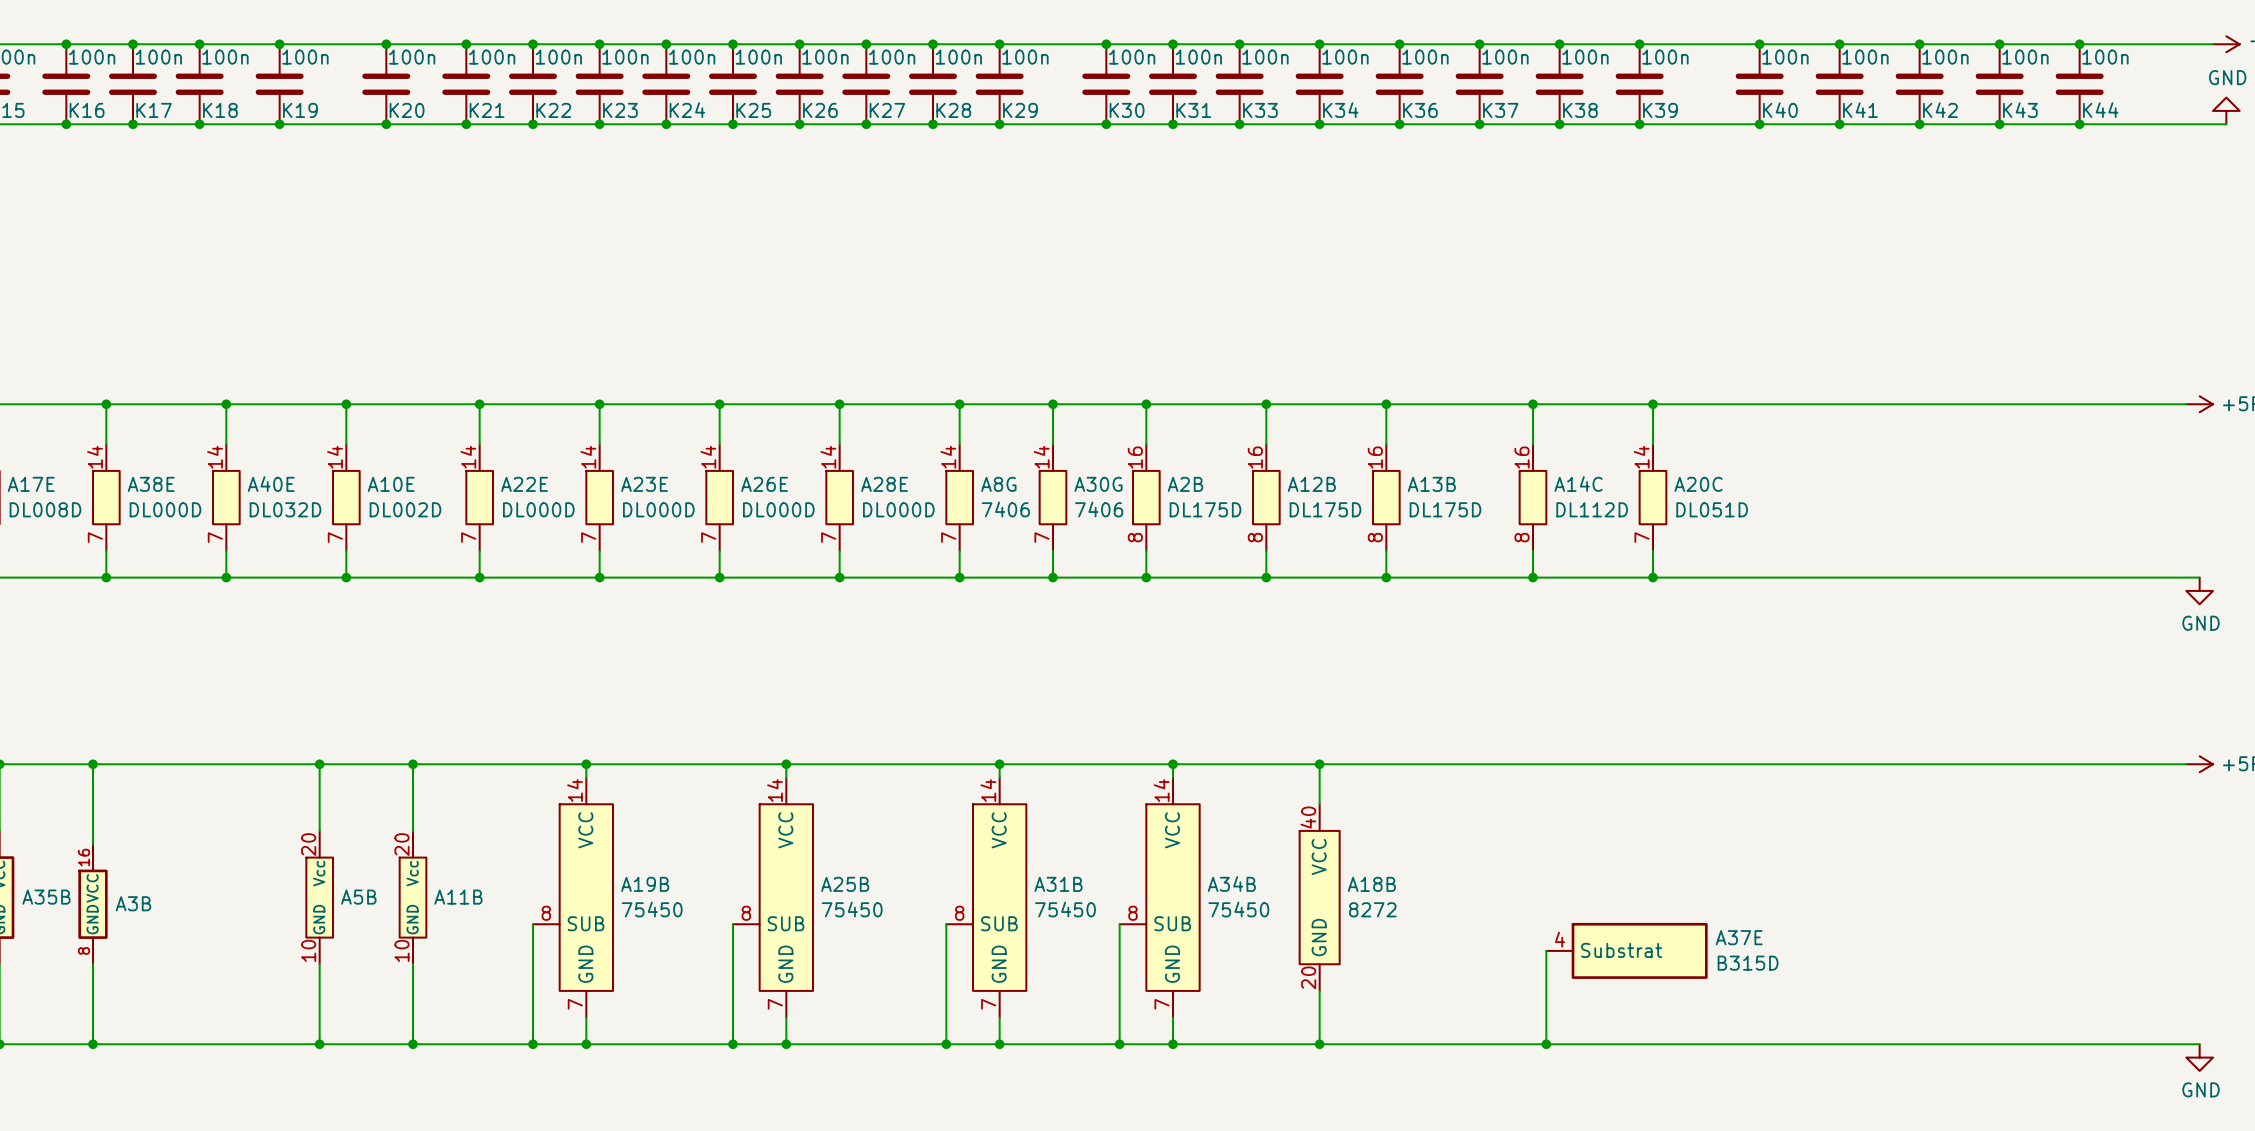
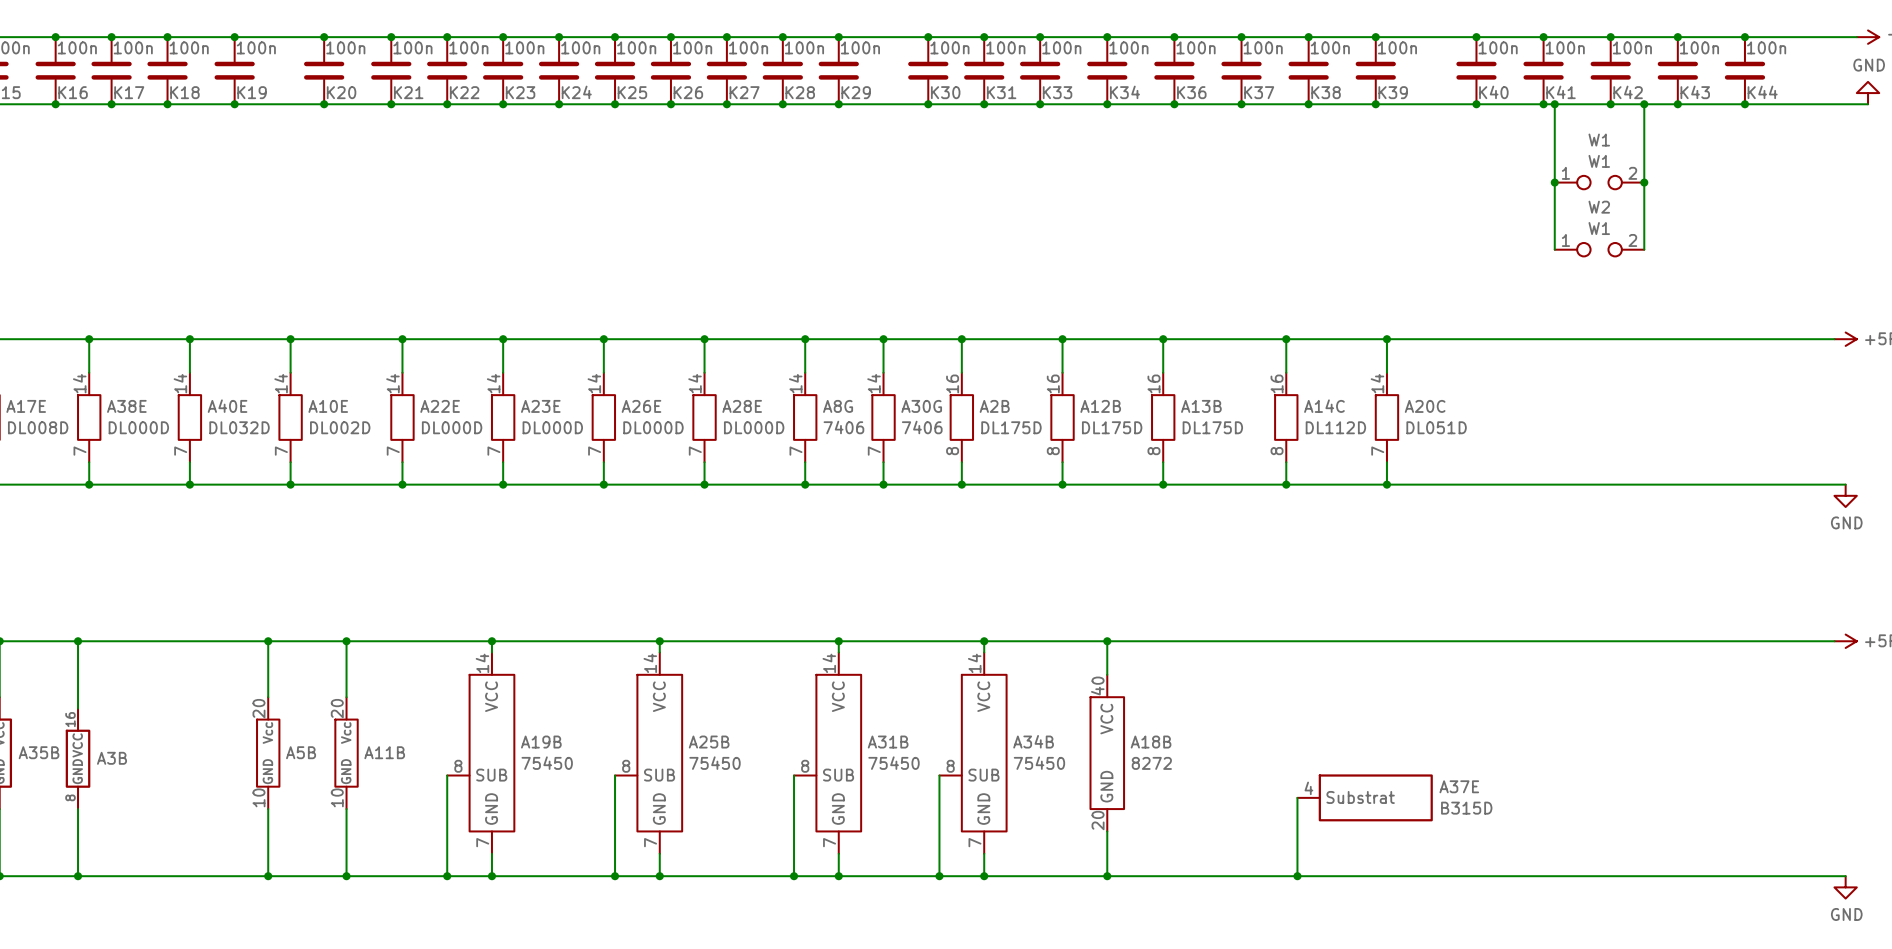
wire: none -> (1554, 104) (1554, 249)
junction: none -> (1554, 104)
wire: none -> (1644, 104) (1644, 249)
junction: none -> (1644, 104)
junction: none -> (1554, 182)
W1: none -> W1 (1599, 182)
junction: none -> (1644, 182)
W2: none -> W1 (1599, 249)

